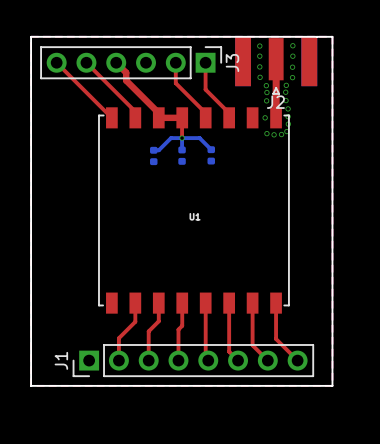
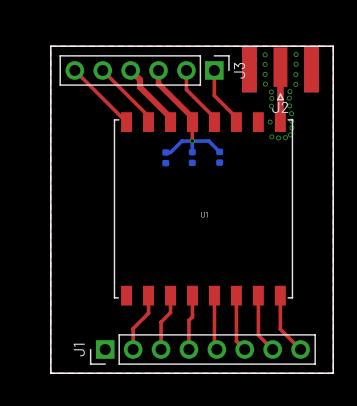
top track: (158, 117) (182, 117) -> (158, 70) (158, 83) (192, 117) (192, 122)

